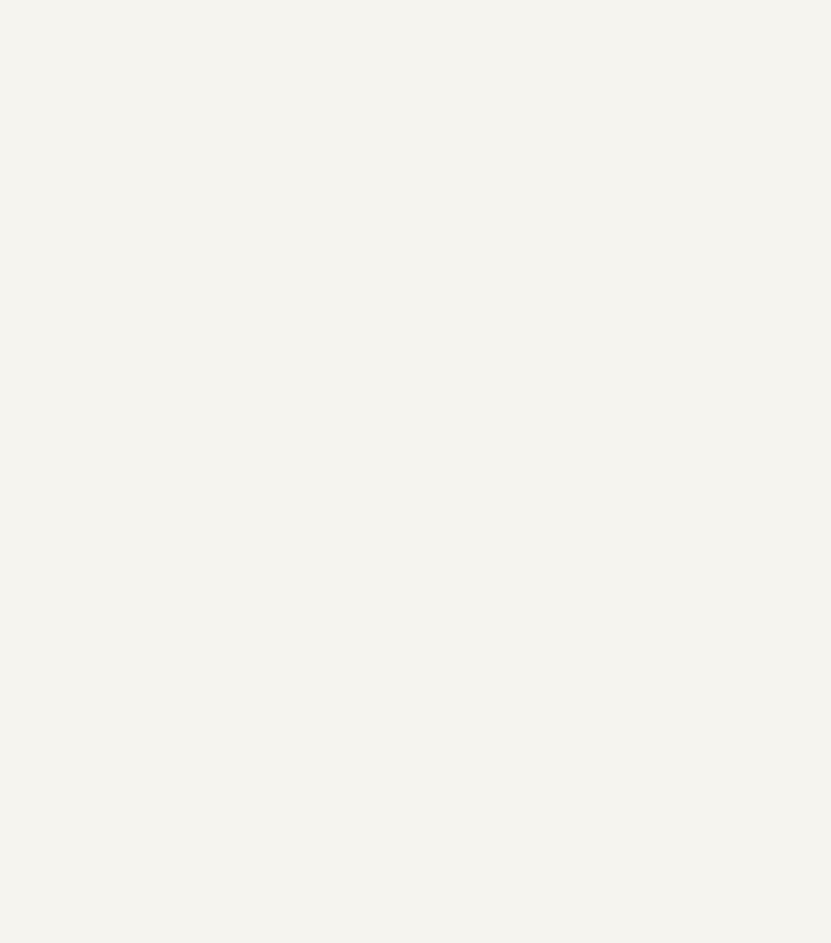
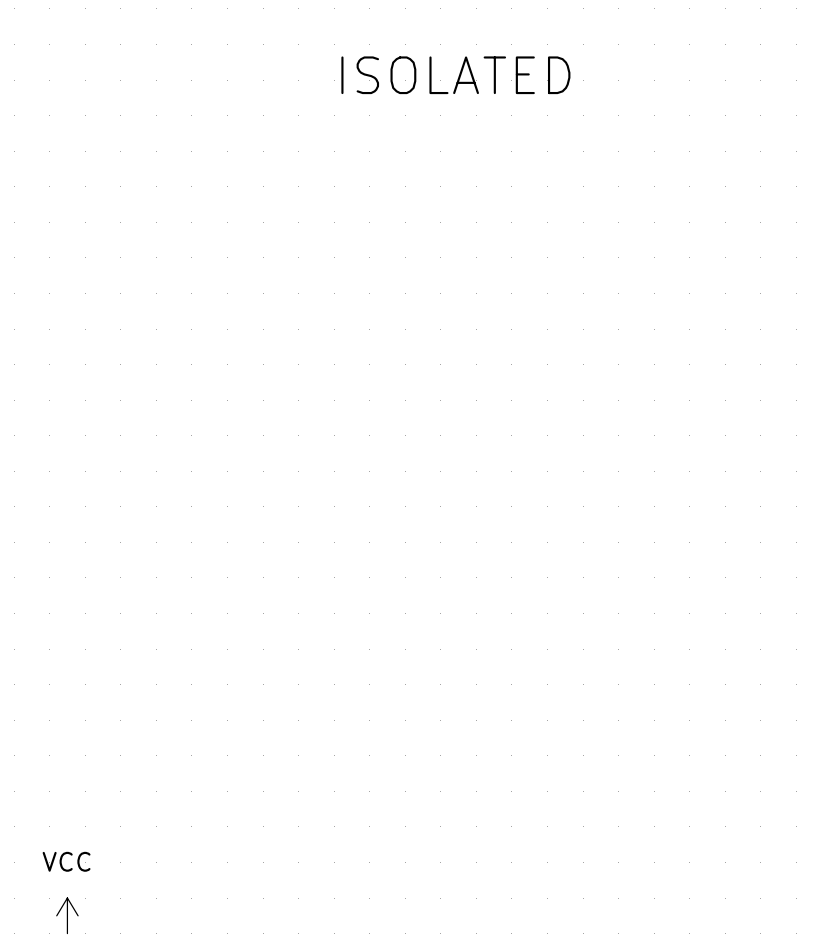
text: none -> ISOLATED (455, 75)
power symbol: none -> VCC (67, 915)

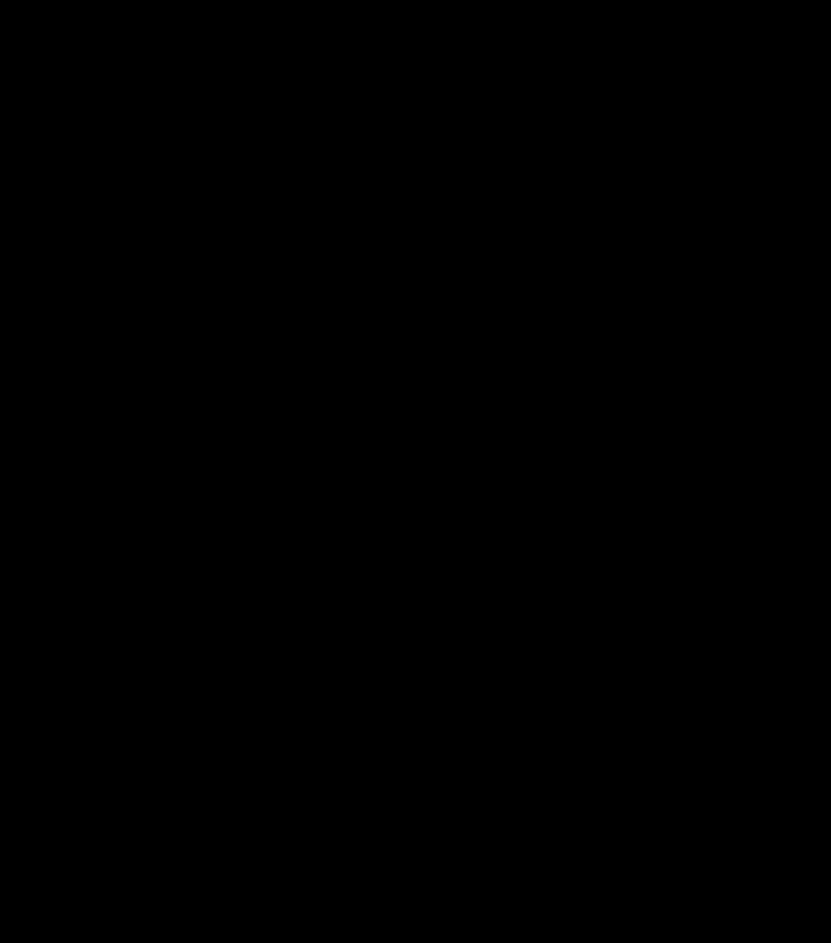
text: ISOLATED (455, 75) -> none
power symbol: VCC (67, 915) -> none

